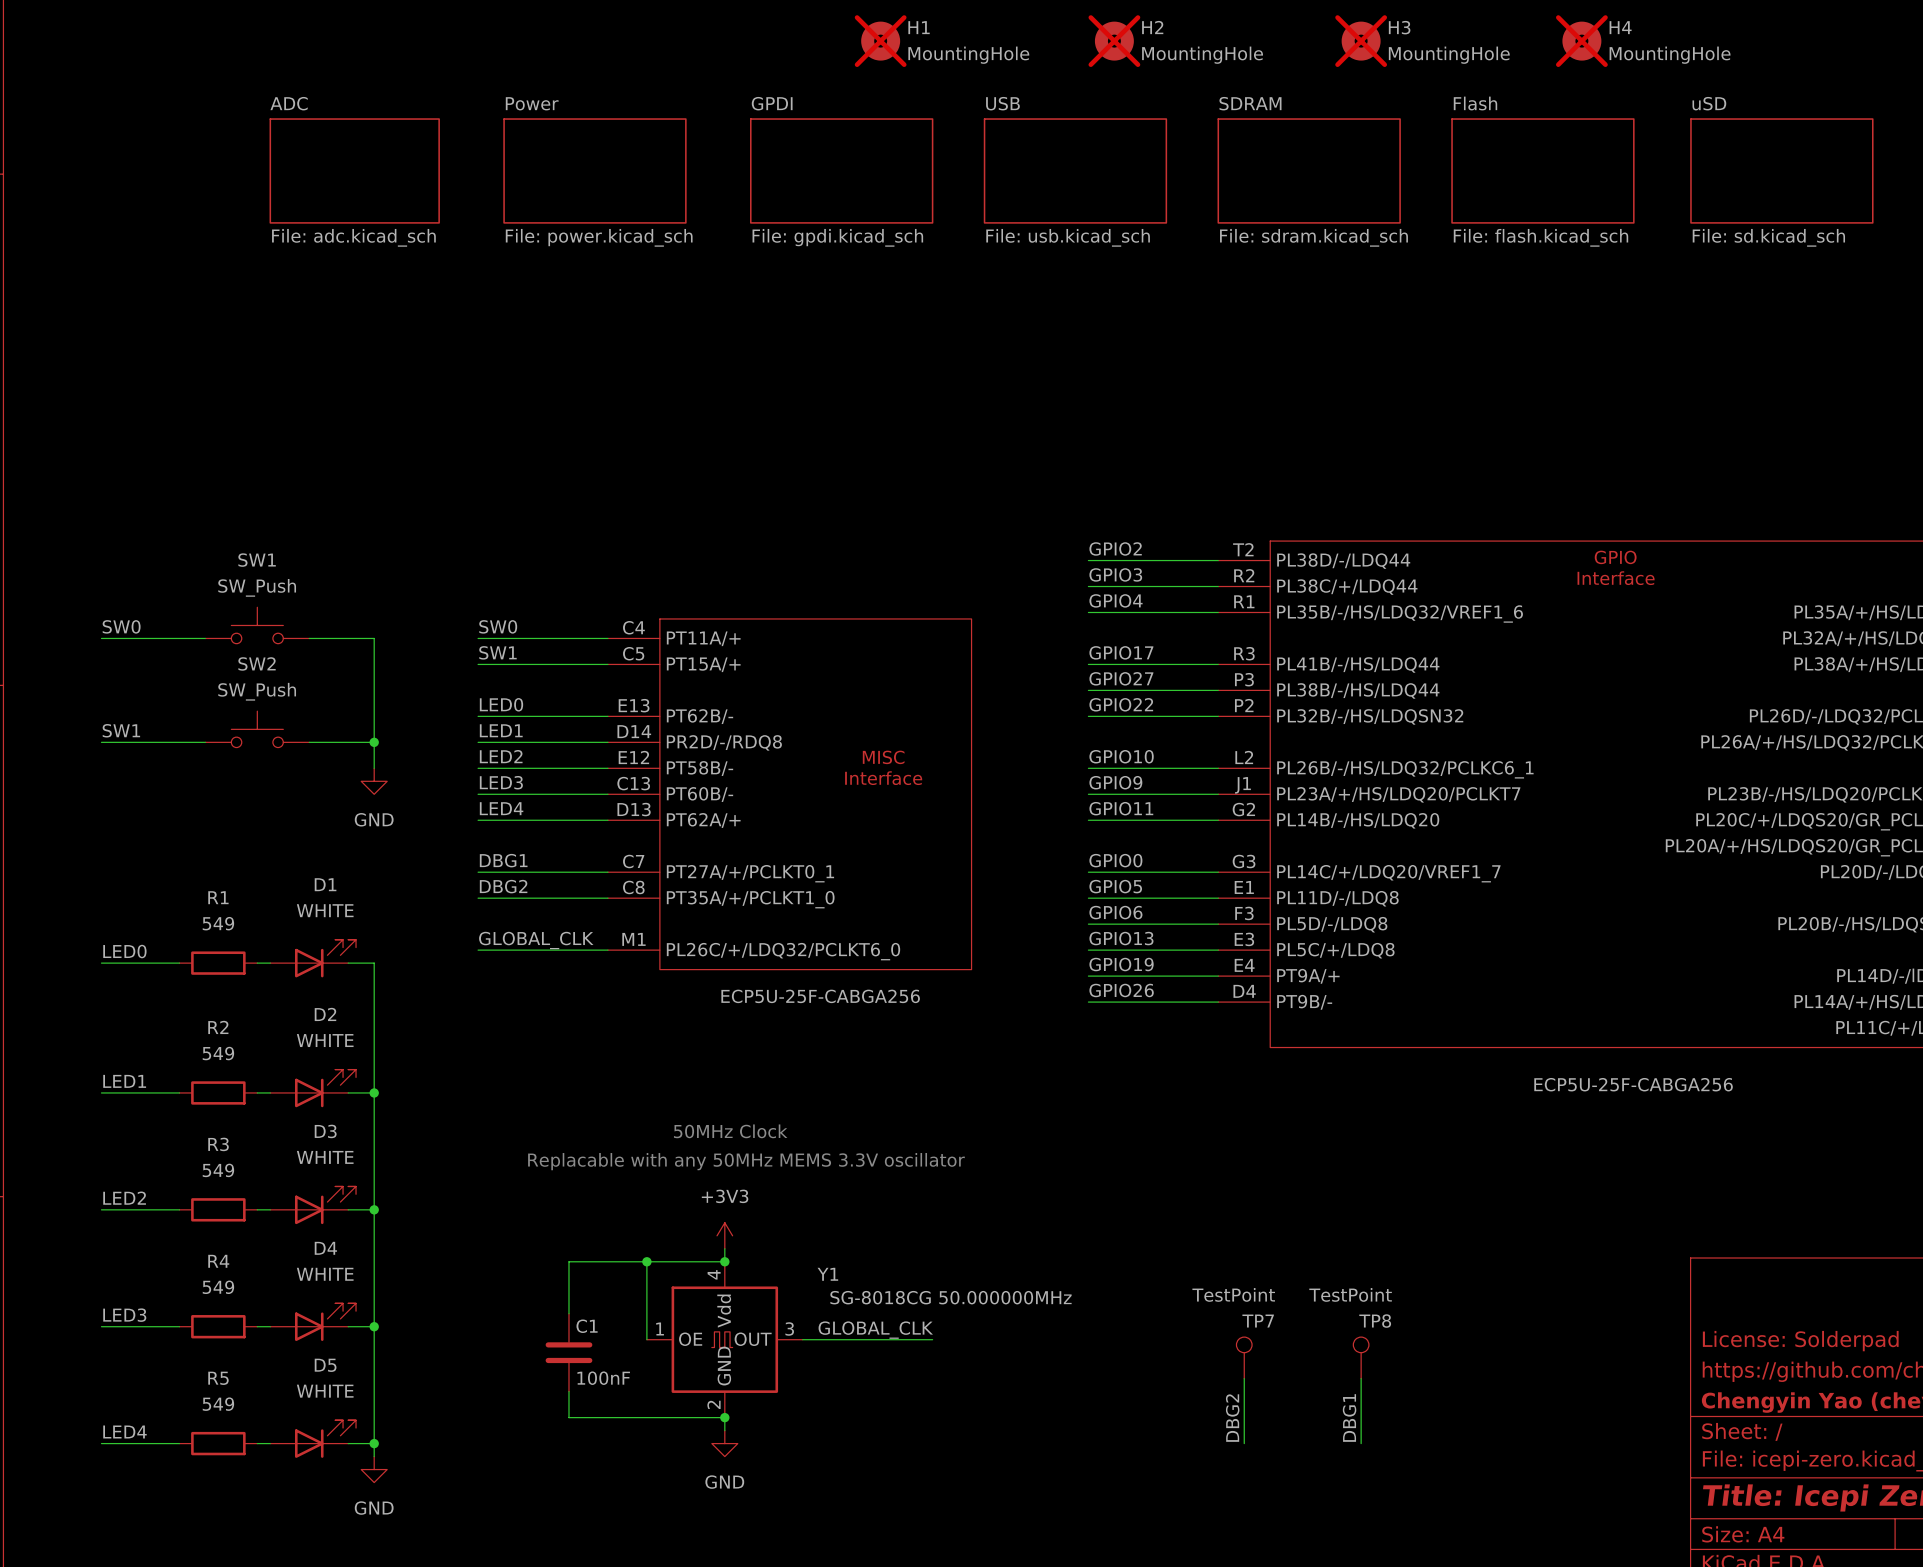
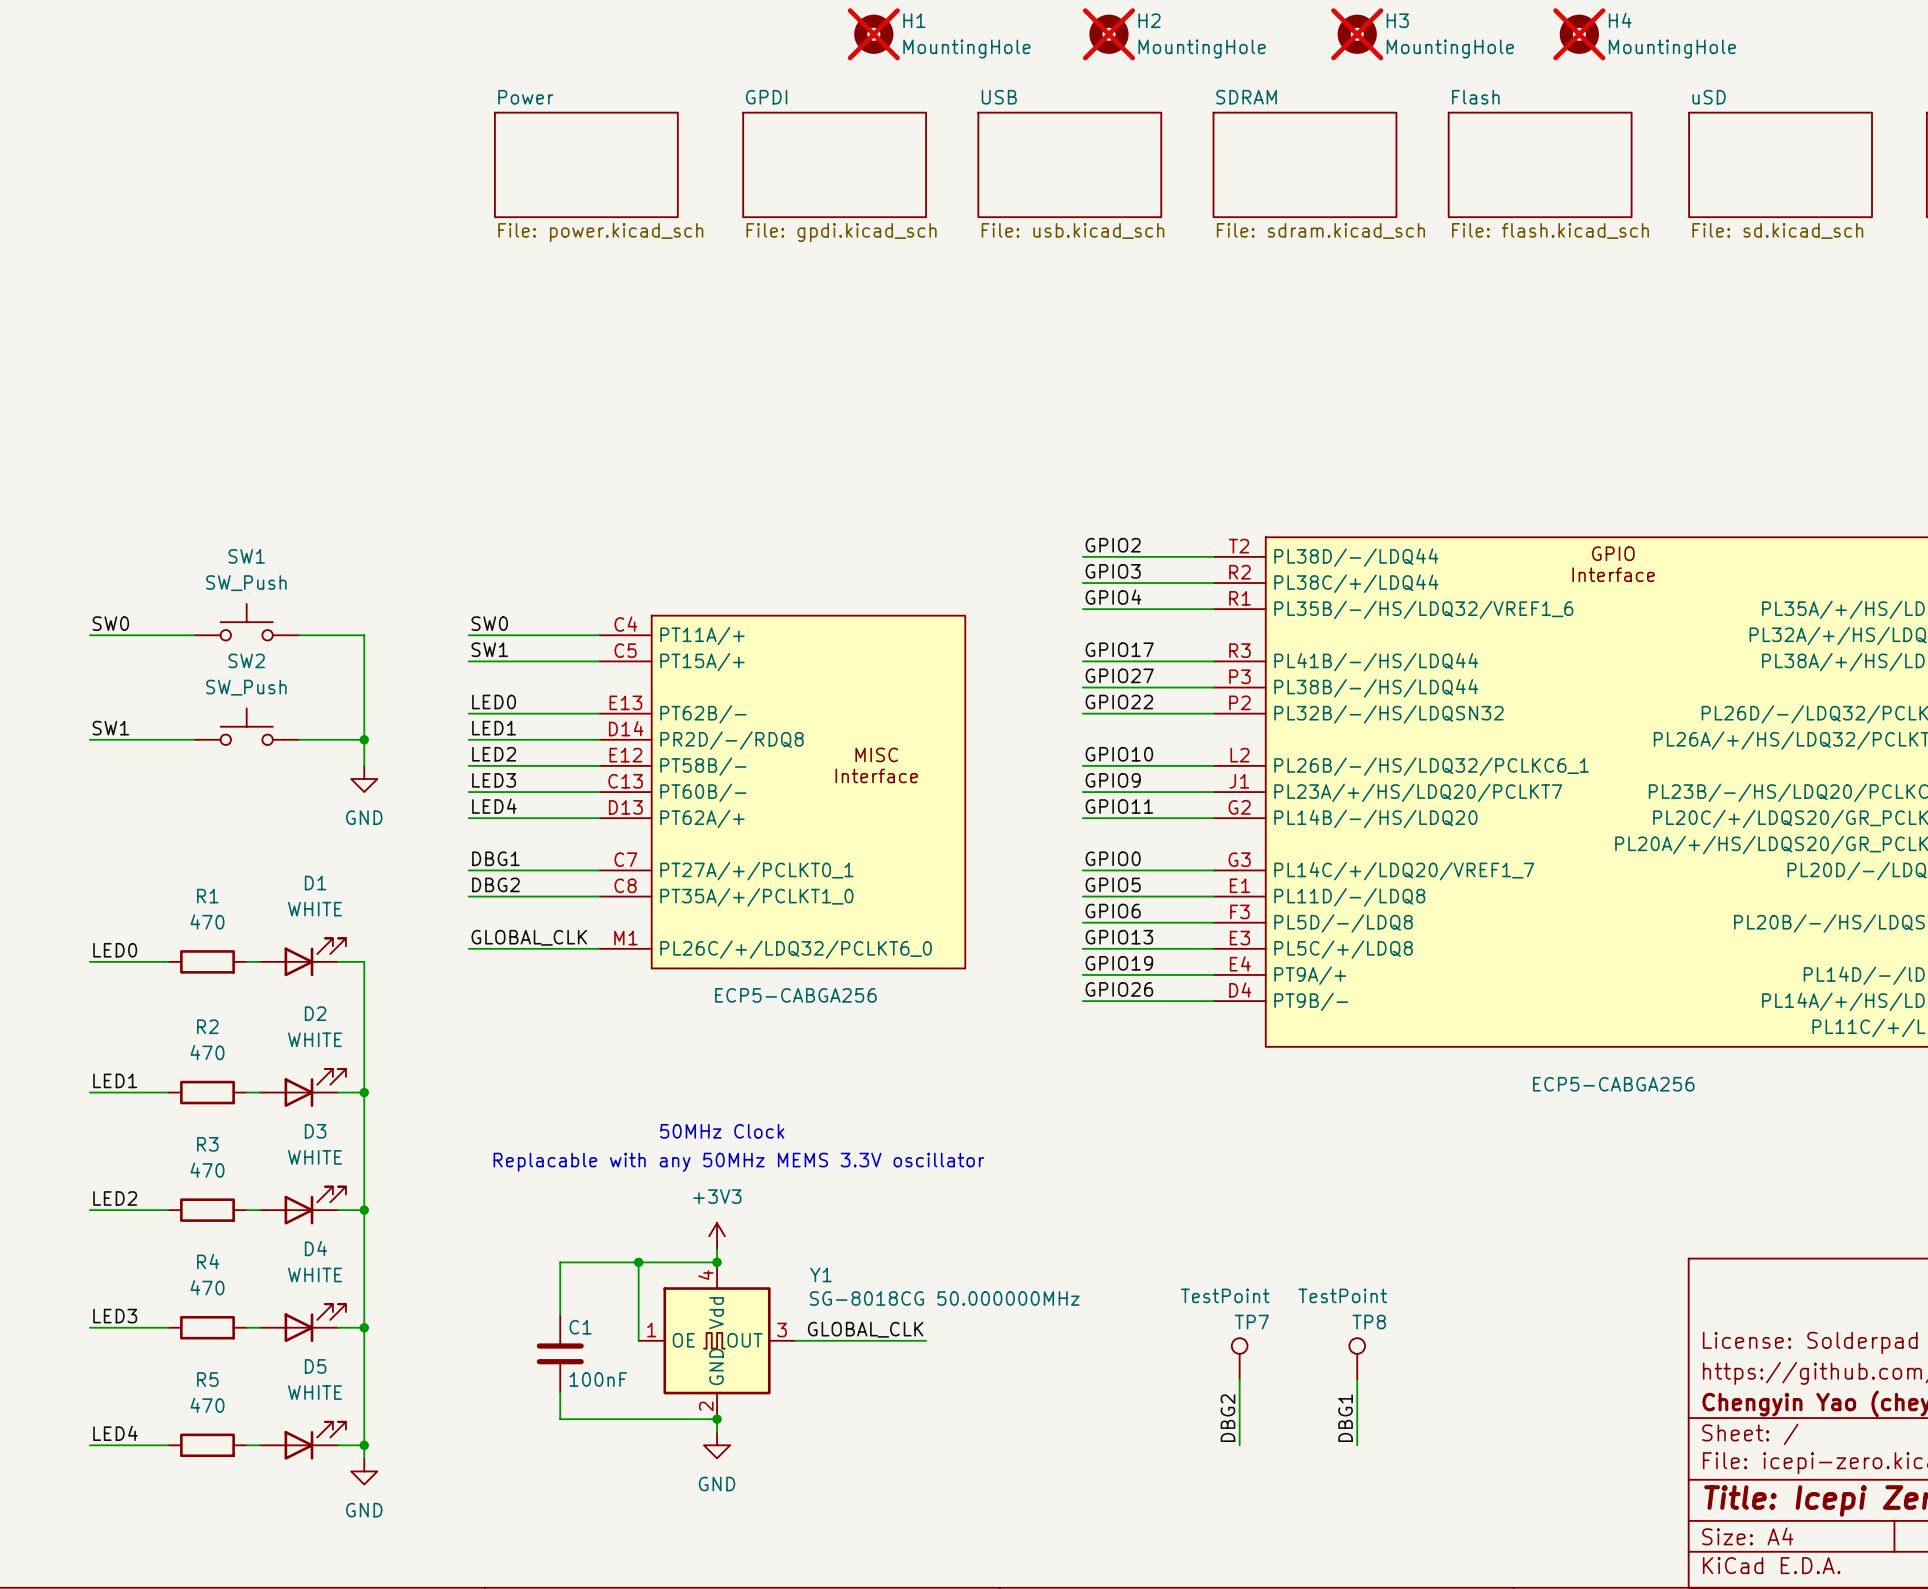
sheet ADC: File: adc.kicad_sch (354, 170) -> none
R1 value: 549 (218, 923) -> 470 (207, 921)
part value: ECP5U-25F-CABGA256 (820, 996) -> ECP5-CABGA256 (795, 995)
R2 value: 549 (218, 1053) -> 470 (207, 1052)
part value: ECP5U-25F-CABGA256 (1633, 1084) -> ECP5-CABGA256 (1613, 1084)
R3 value: 549 (218, 1170) -> 470 (207, 1170)
R4 value: 549 (218, 1287) -> 470 (207, 1287)
R5 value: 549 (218, 1404) -> 470 (207, 1405)

